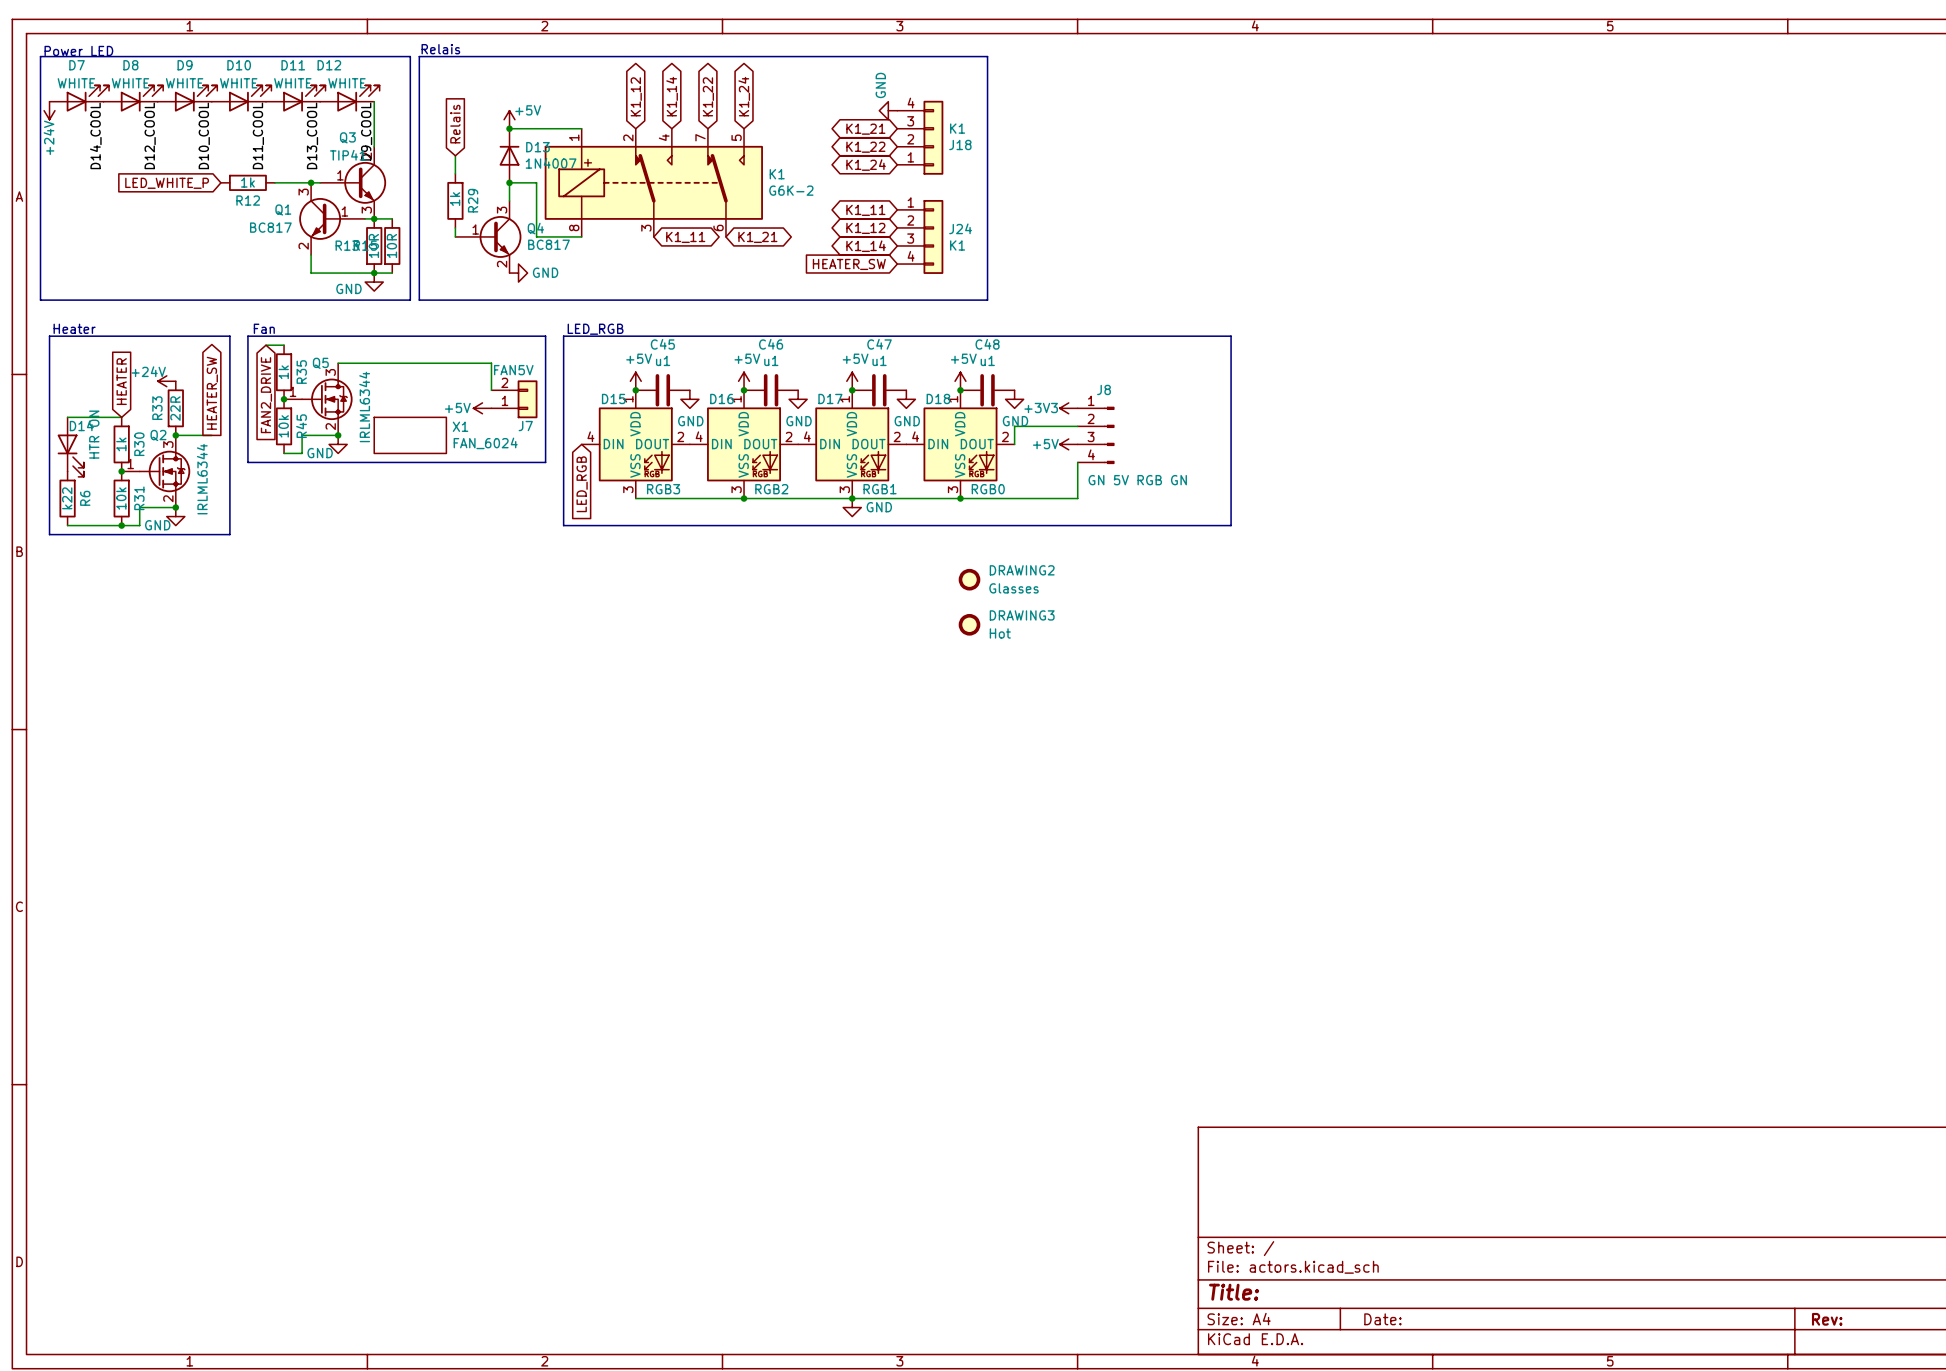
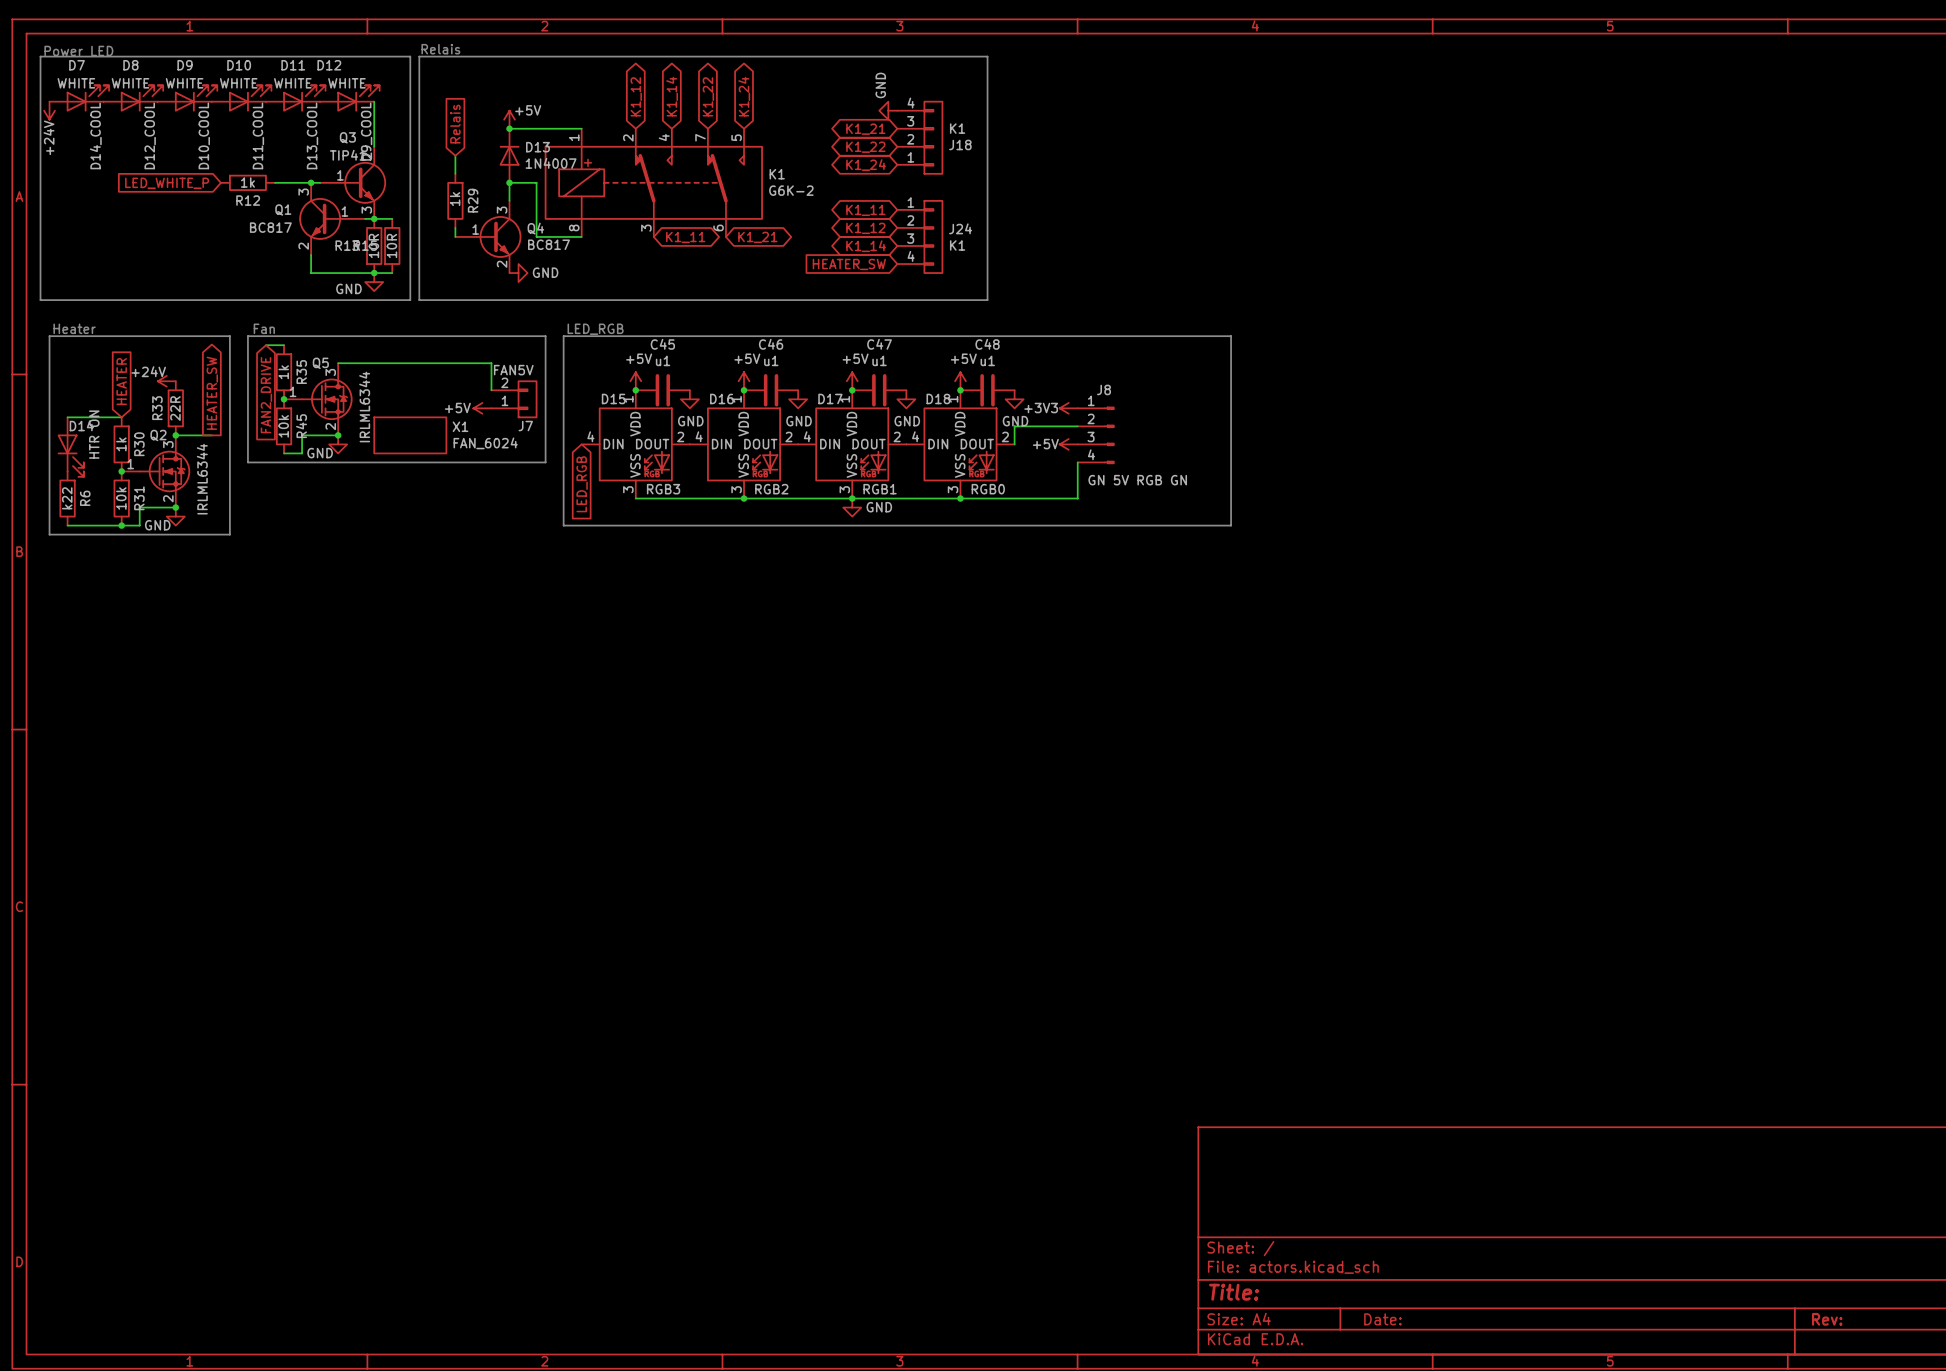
DRAWING2: Glasses (969, 579) -> none
DRAWING3: Hot (969, 624) -> none

